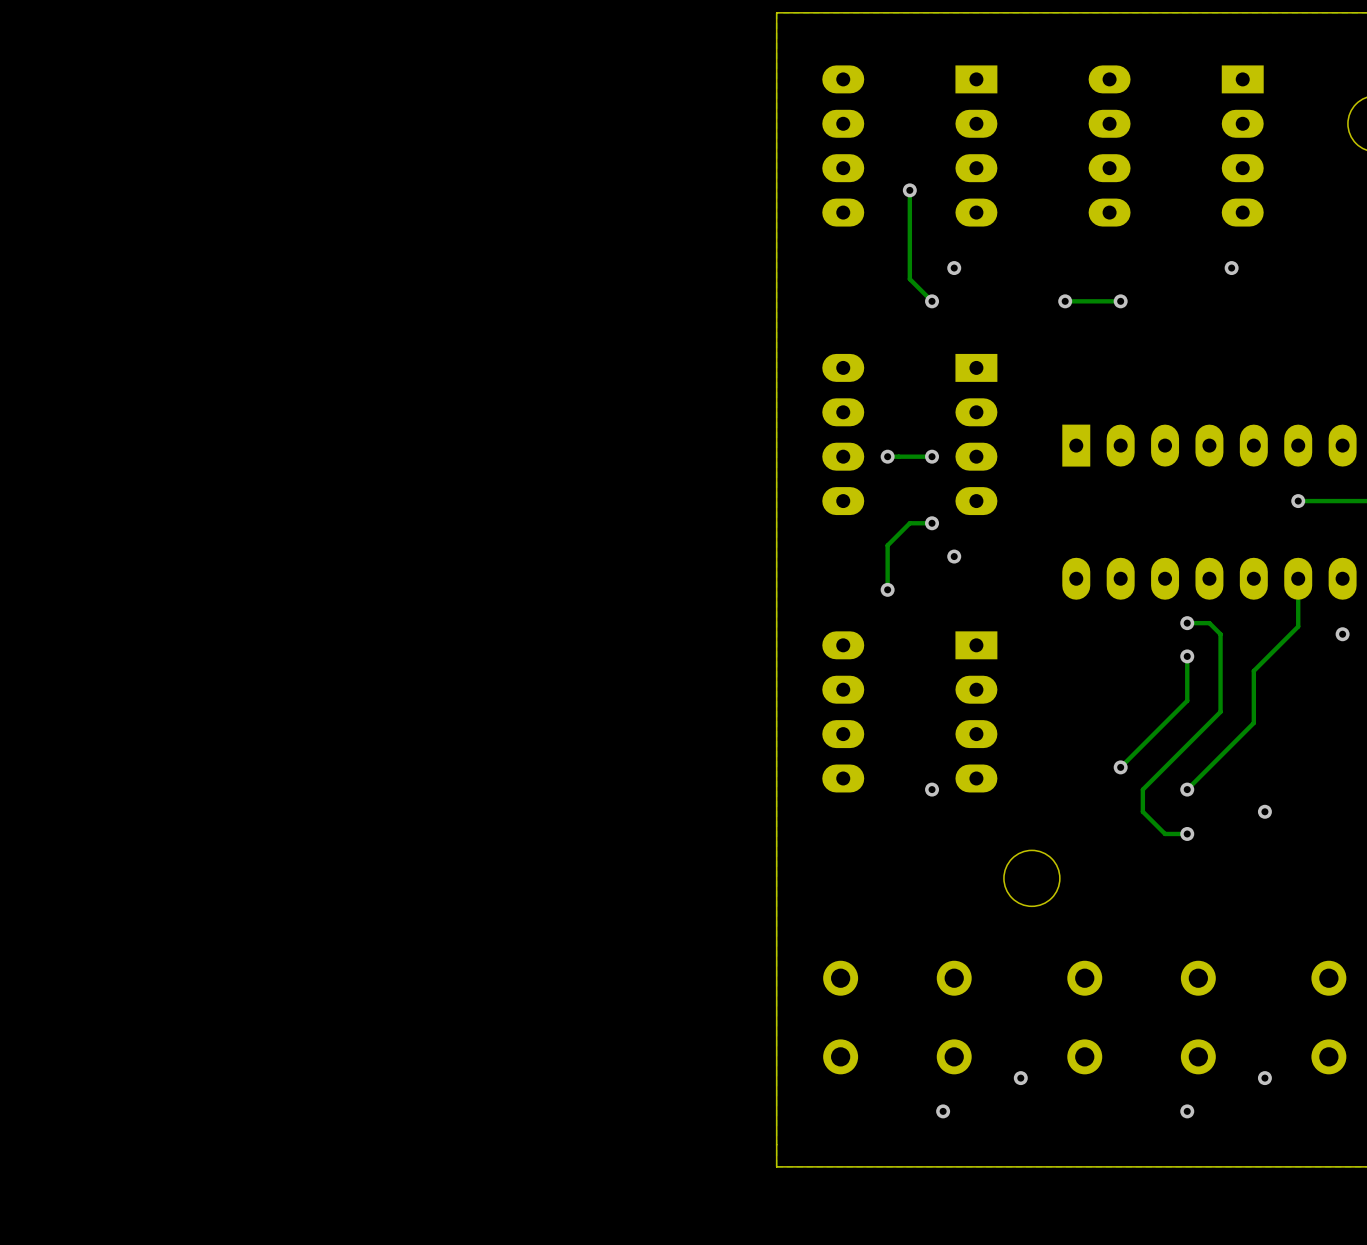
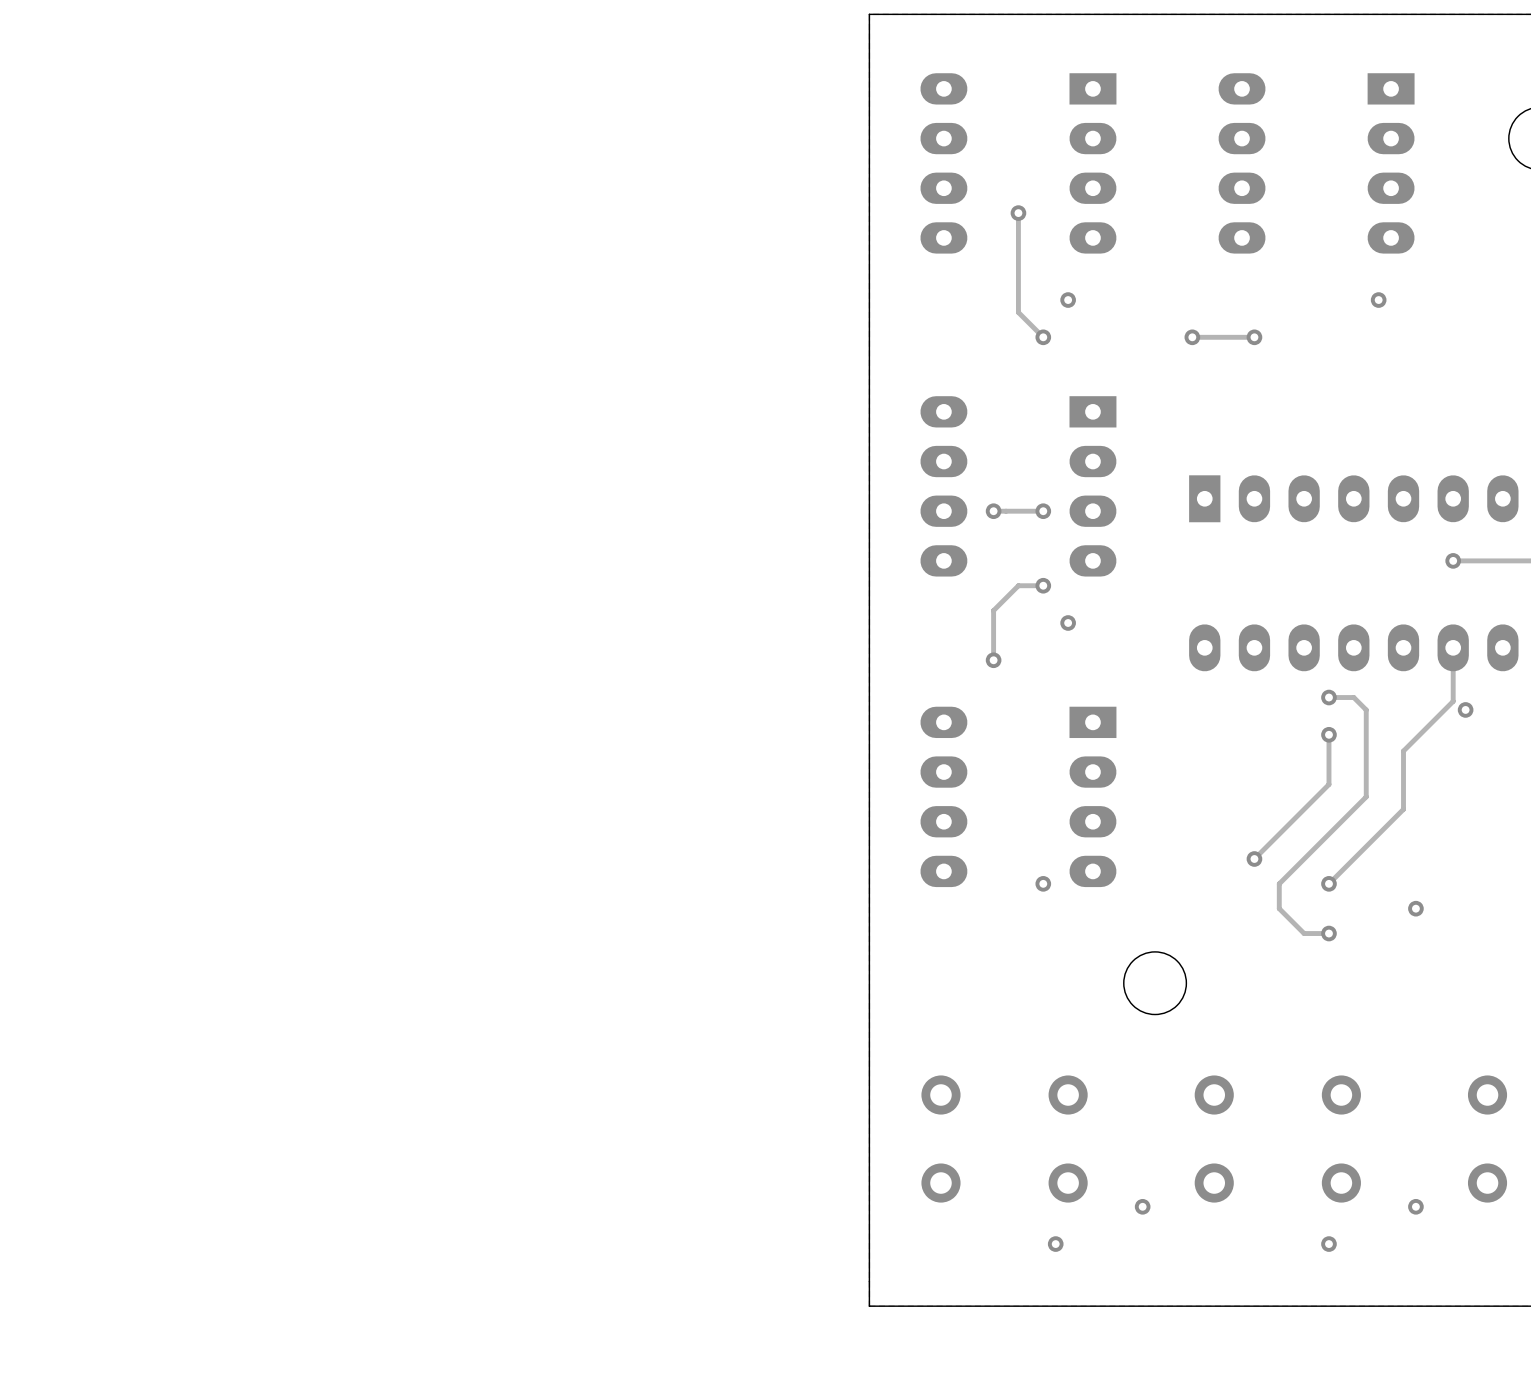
via: none -> (1465, 709)
via: (1342, 634) -> none

